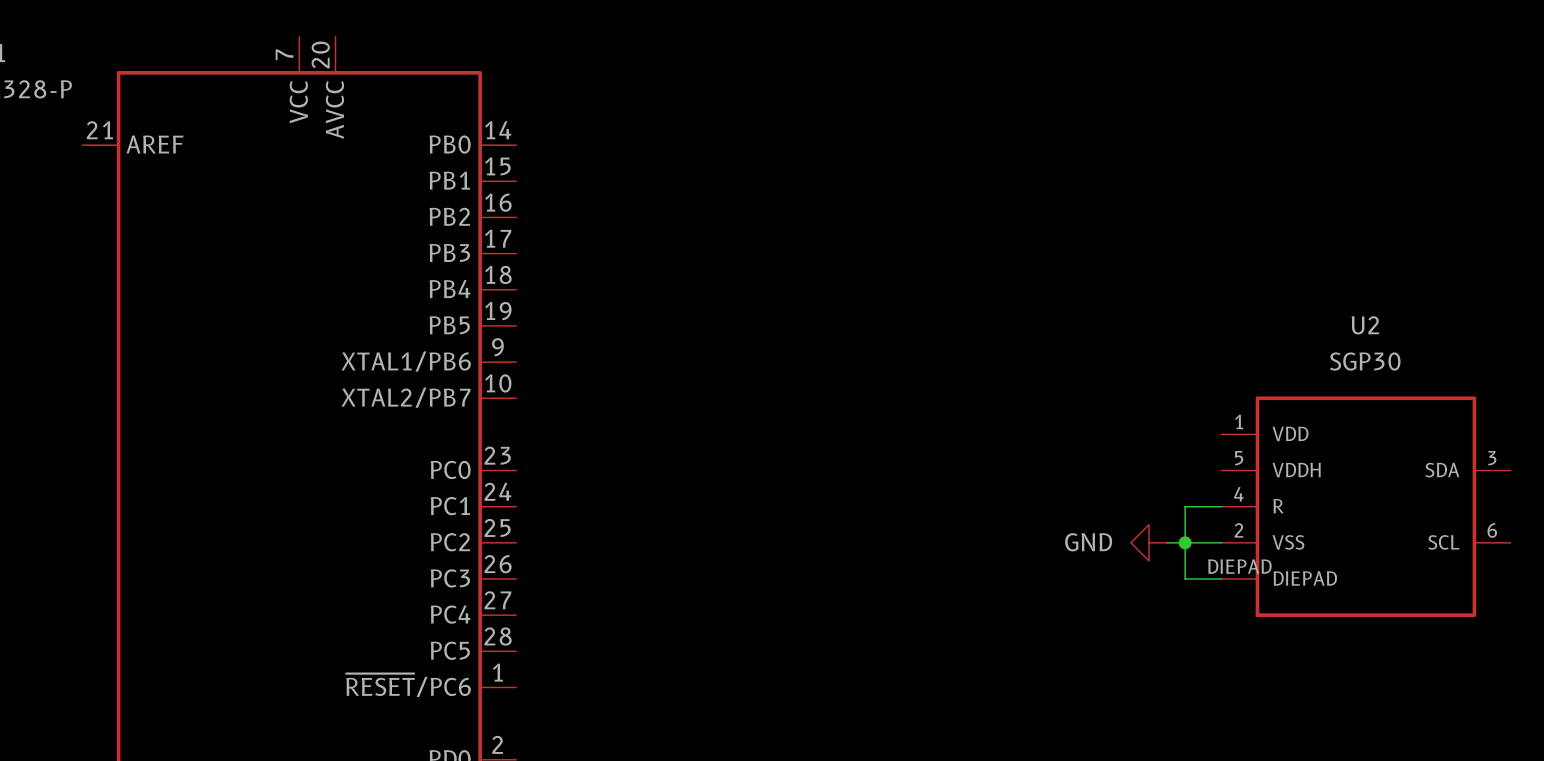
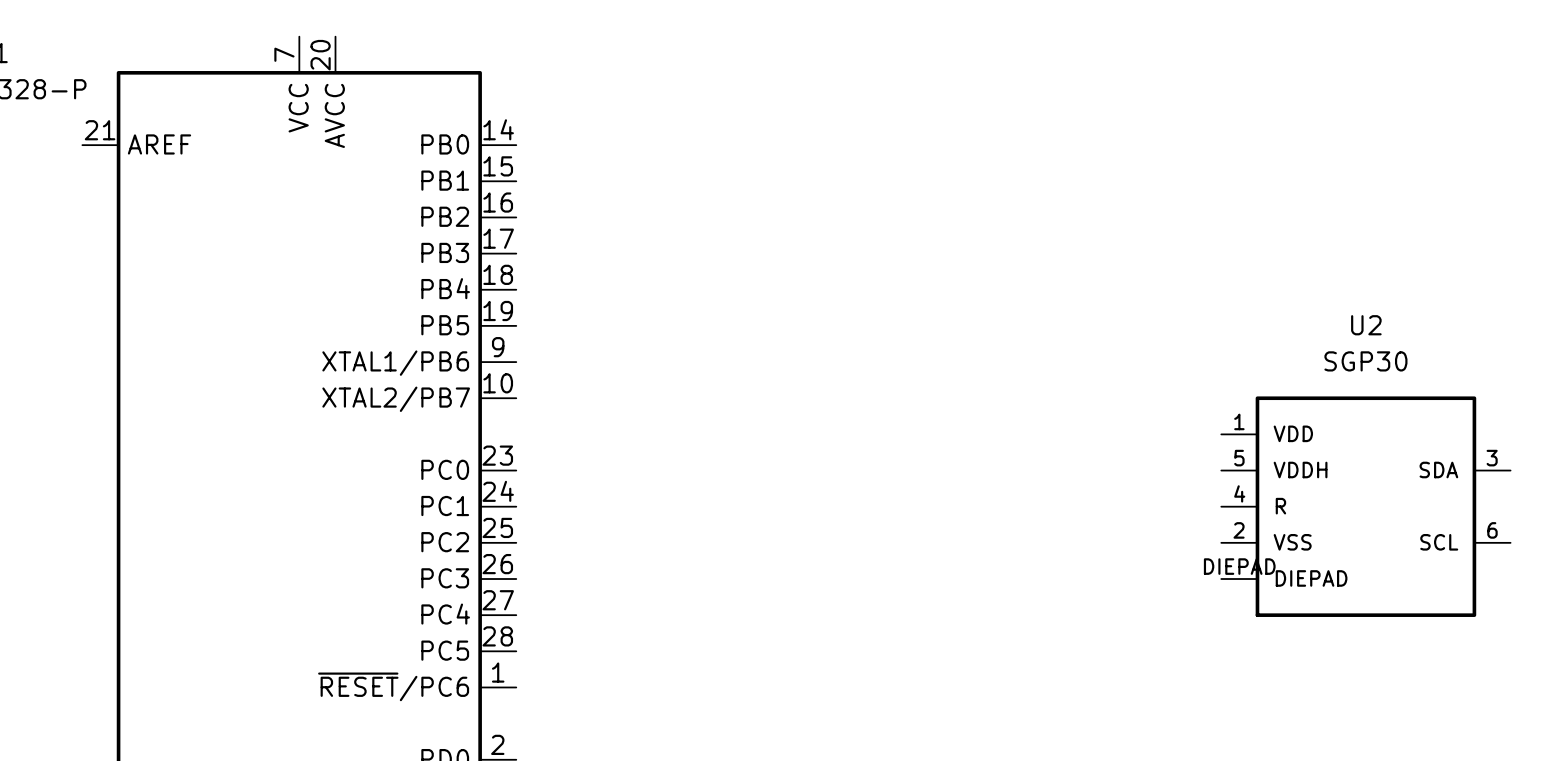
wire: (1221, 506) (1185, 506) (1185, 579) (1221, 579) -> none
power symbol: GND (1149, 542) -> none
wire: (1167, 542) (1221, 542) -> none
junction: (1185, 542) -> none

